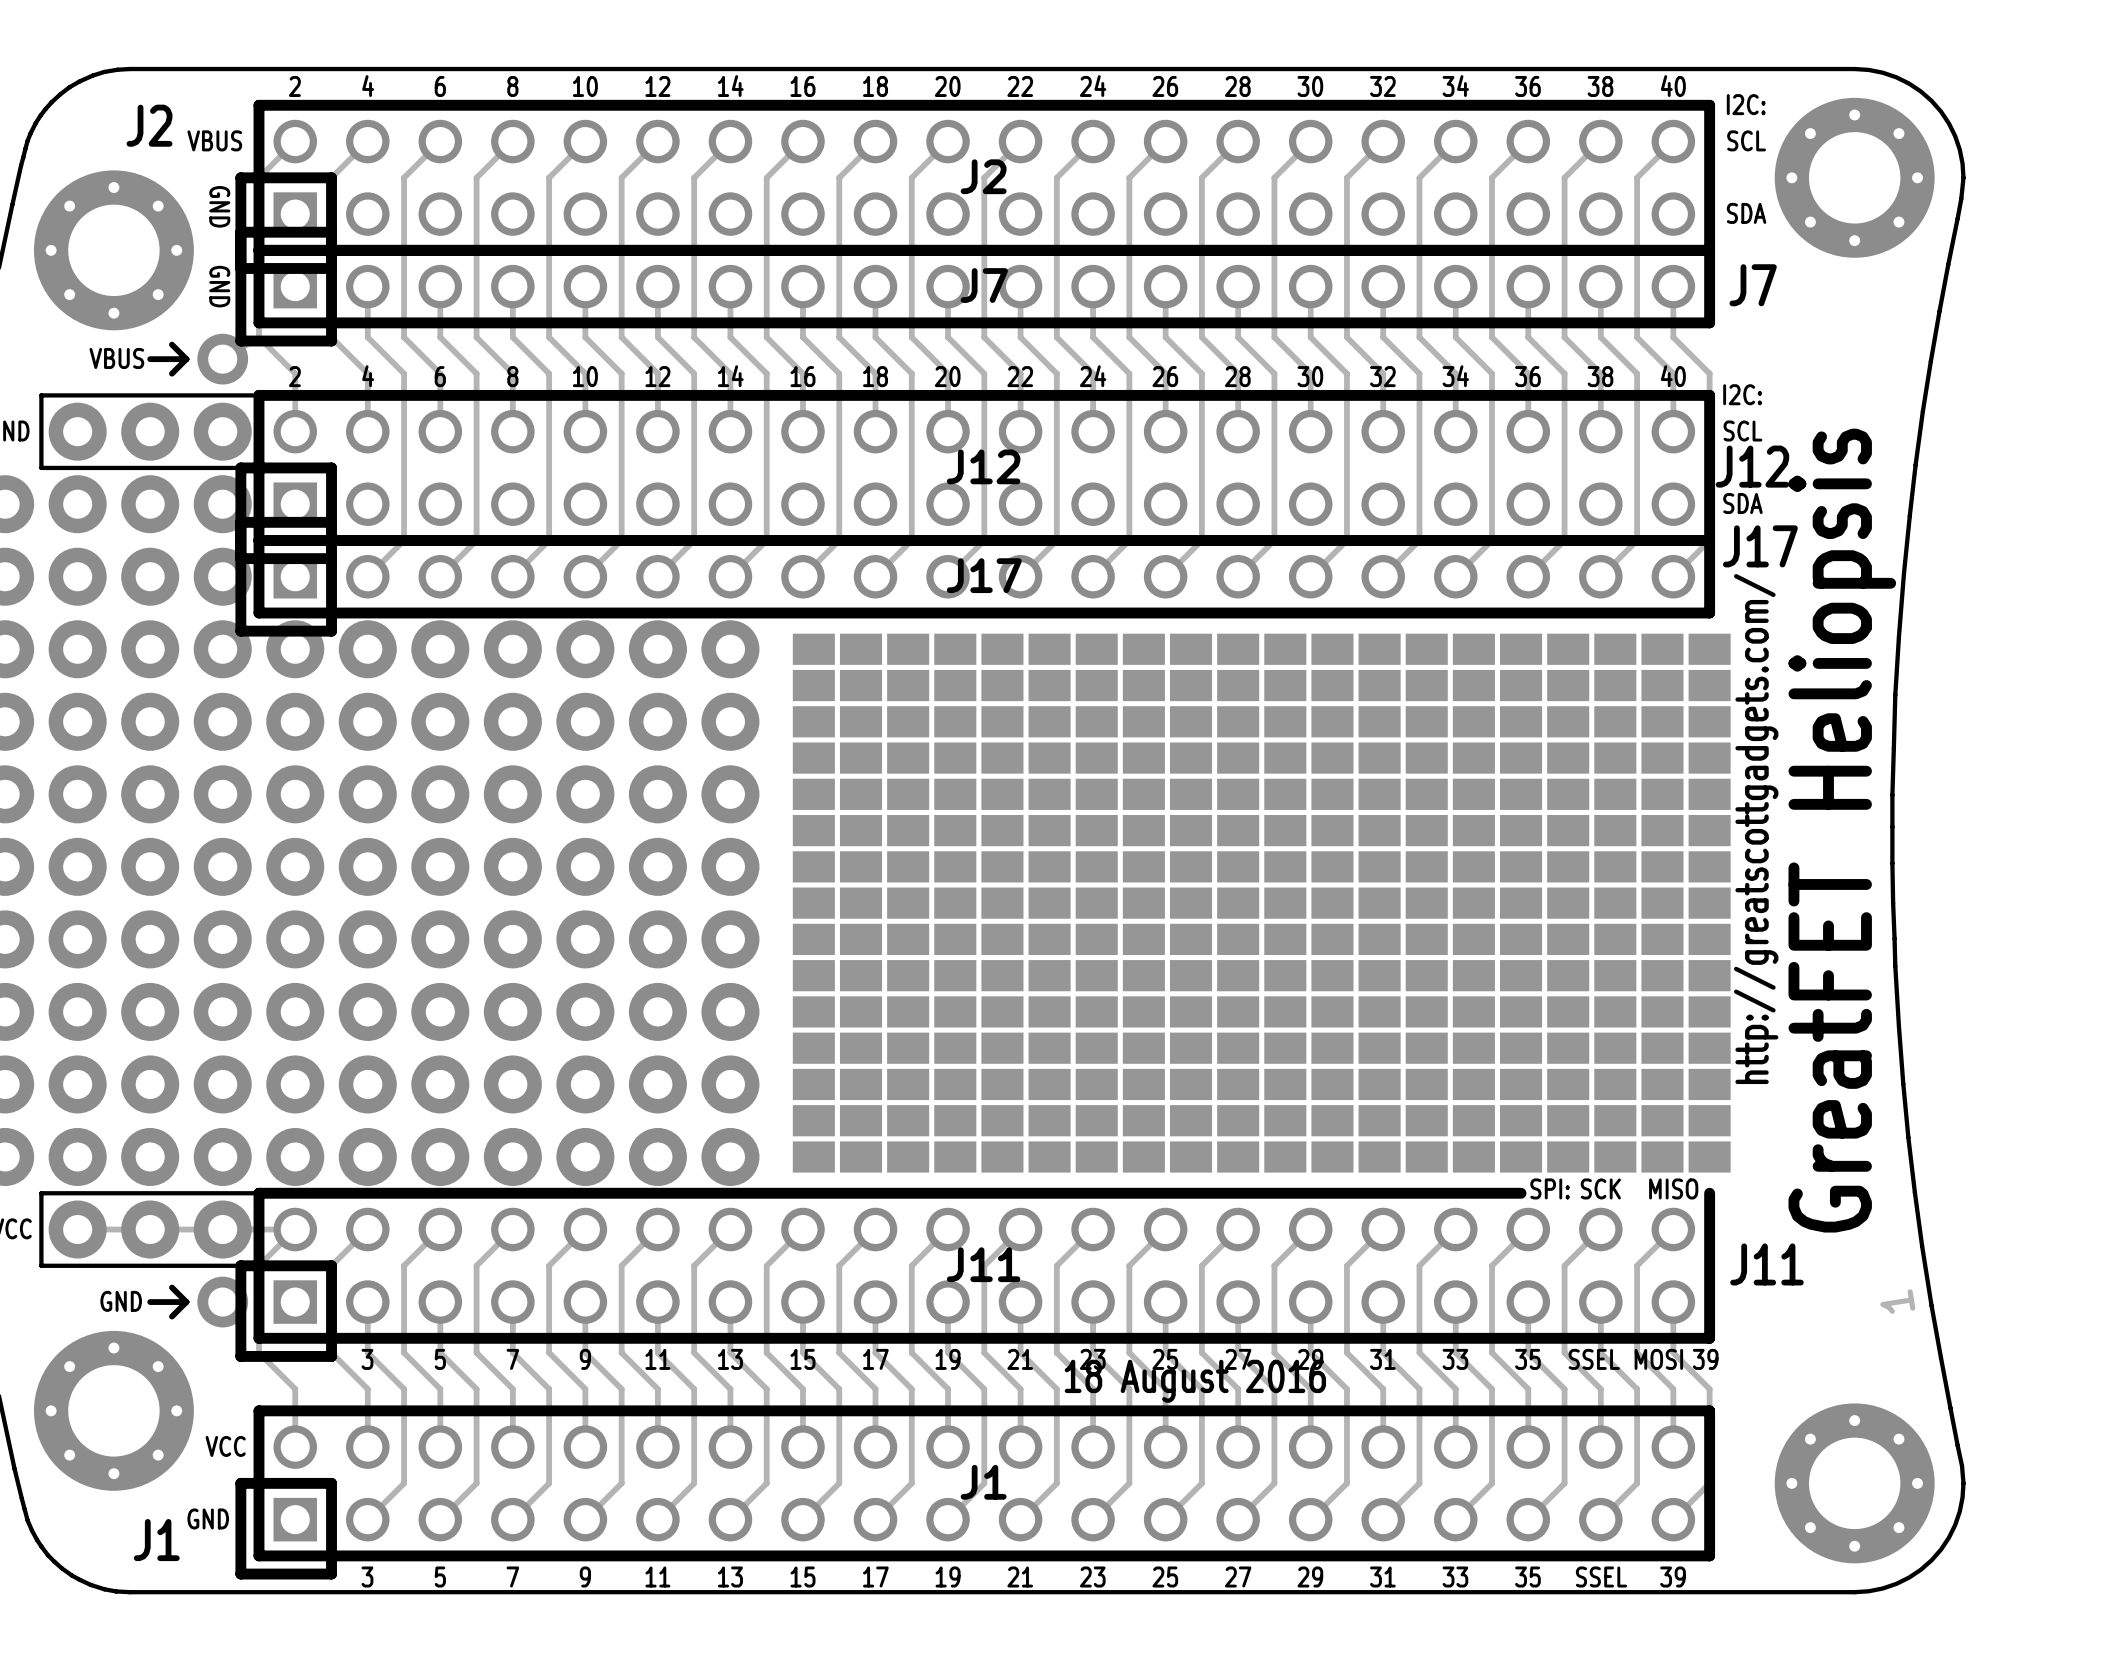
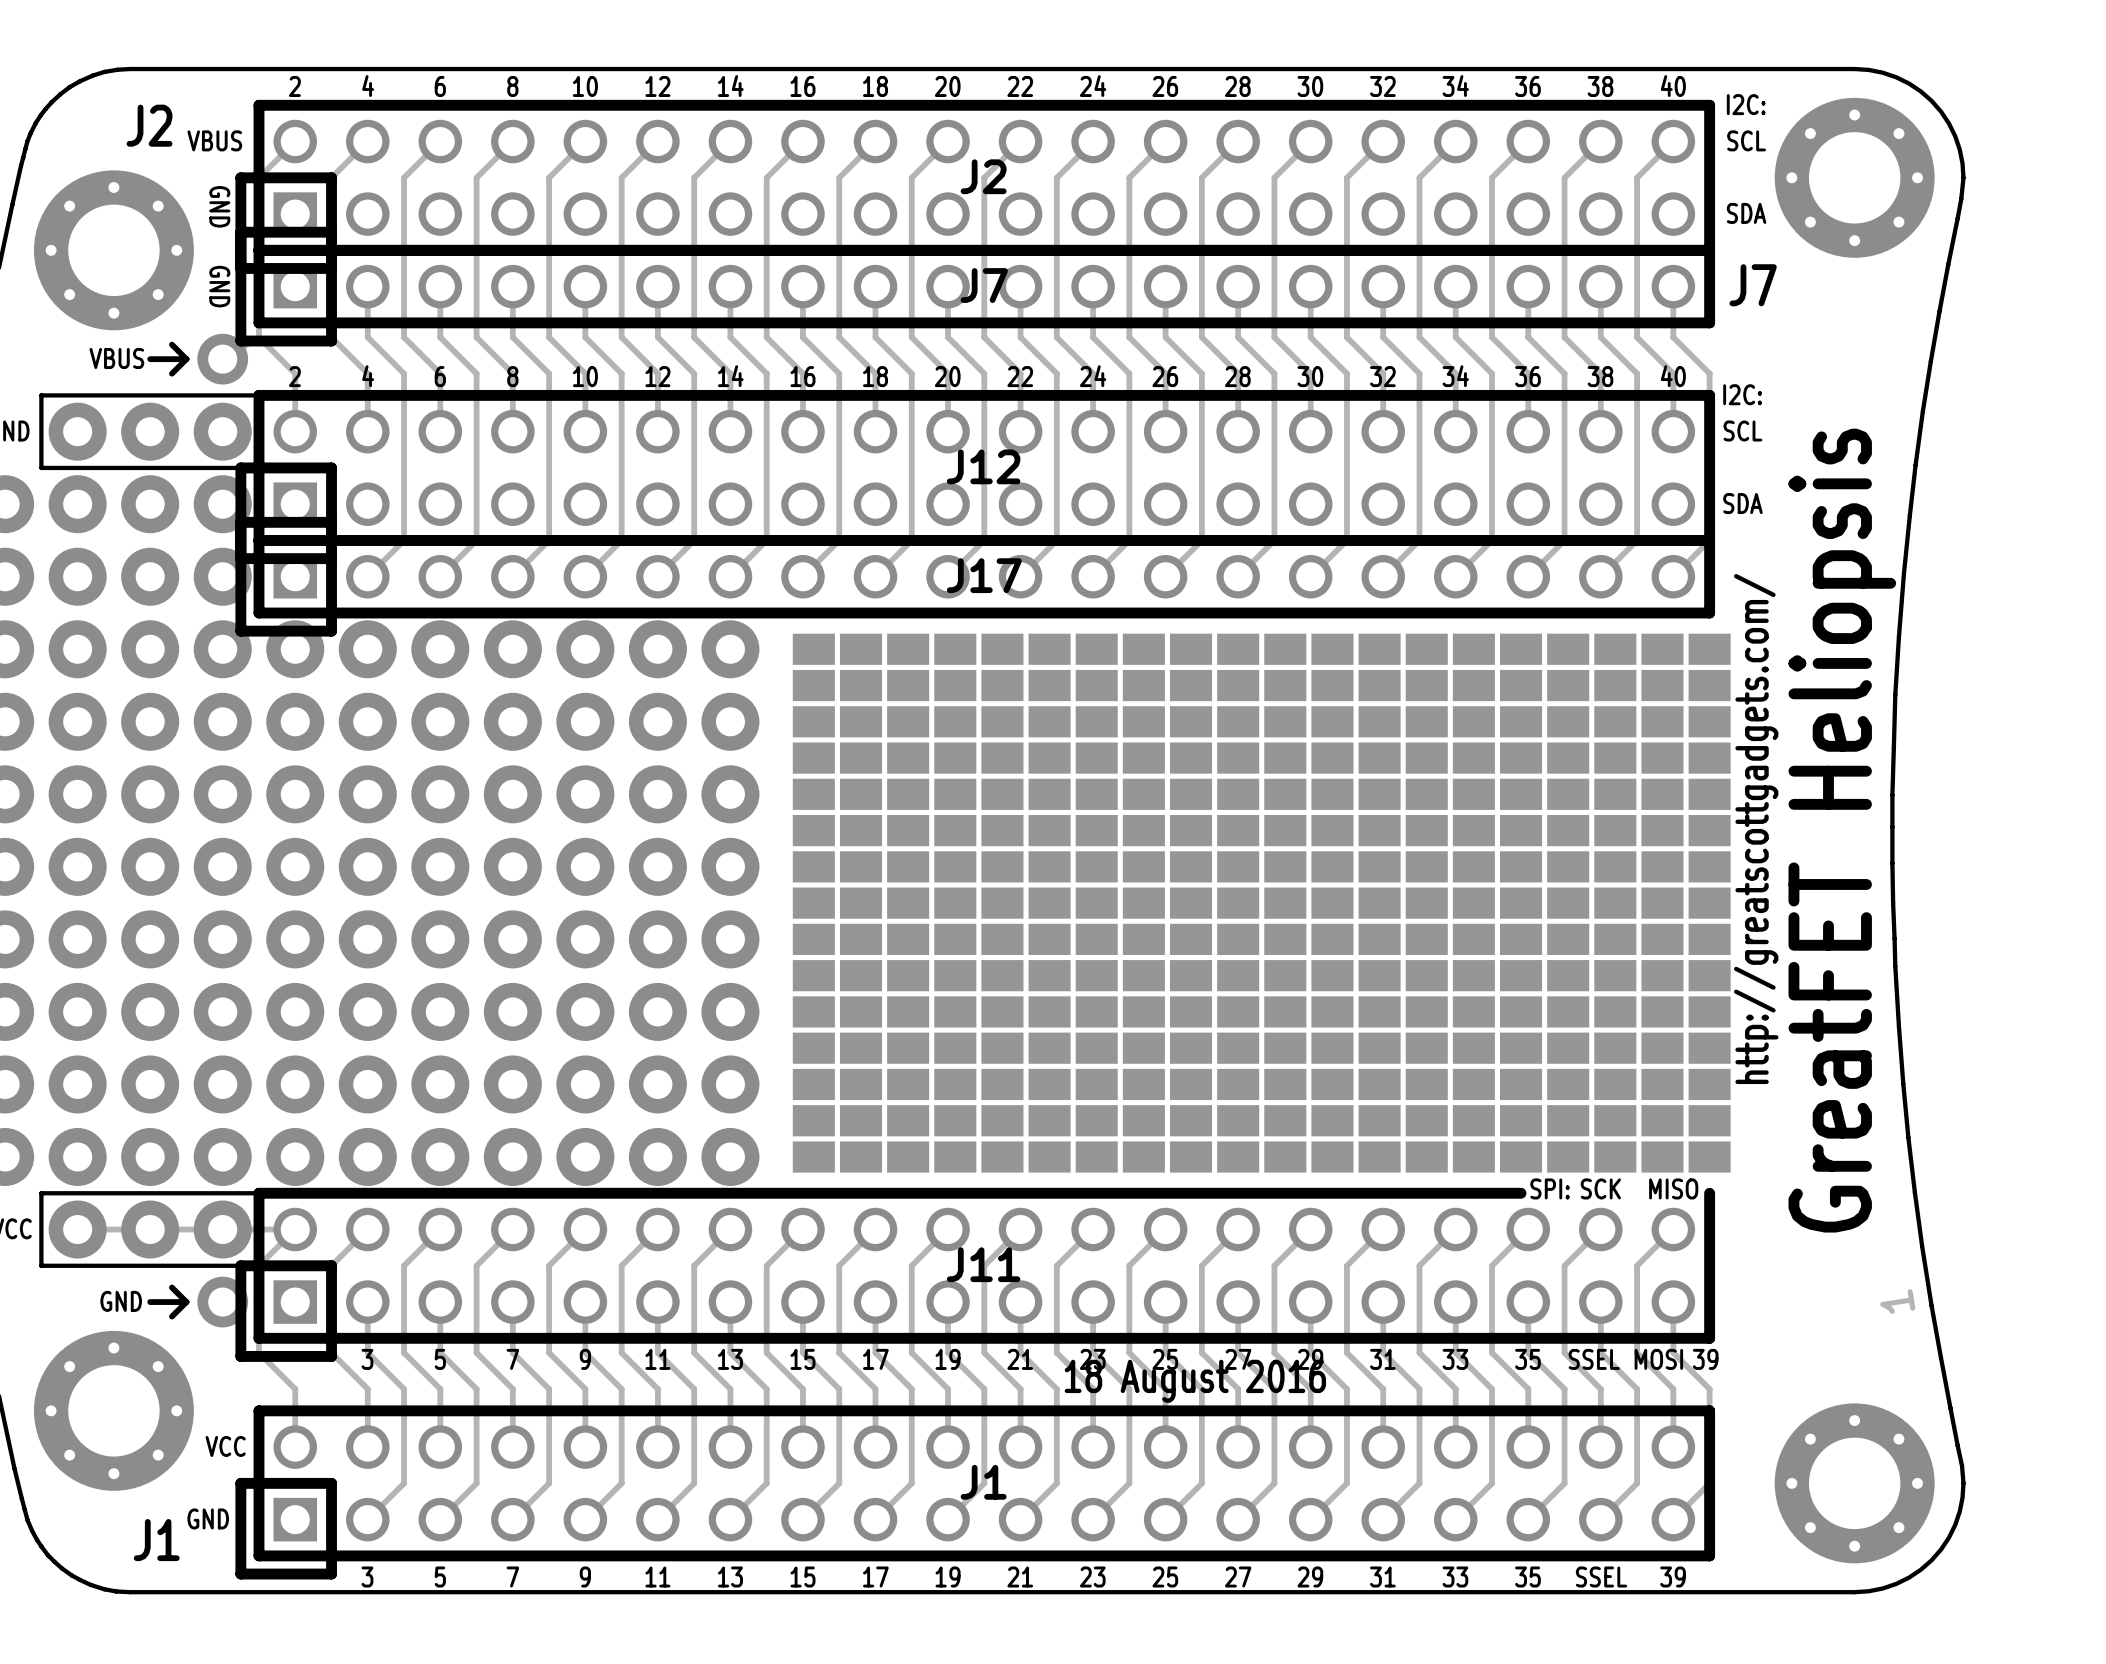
text: J12 (1752, 466) -> none
text: J17 (1760, 546) -> none
text: J11 (1766, 1264) -> none

